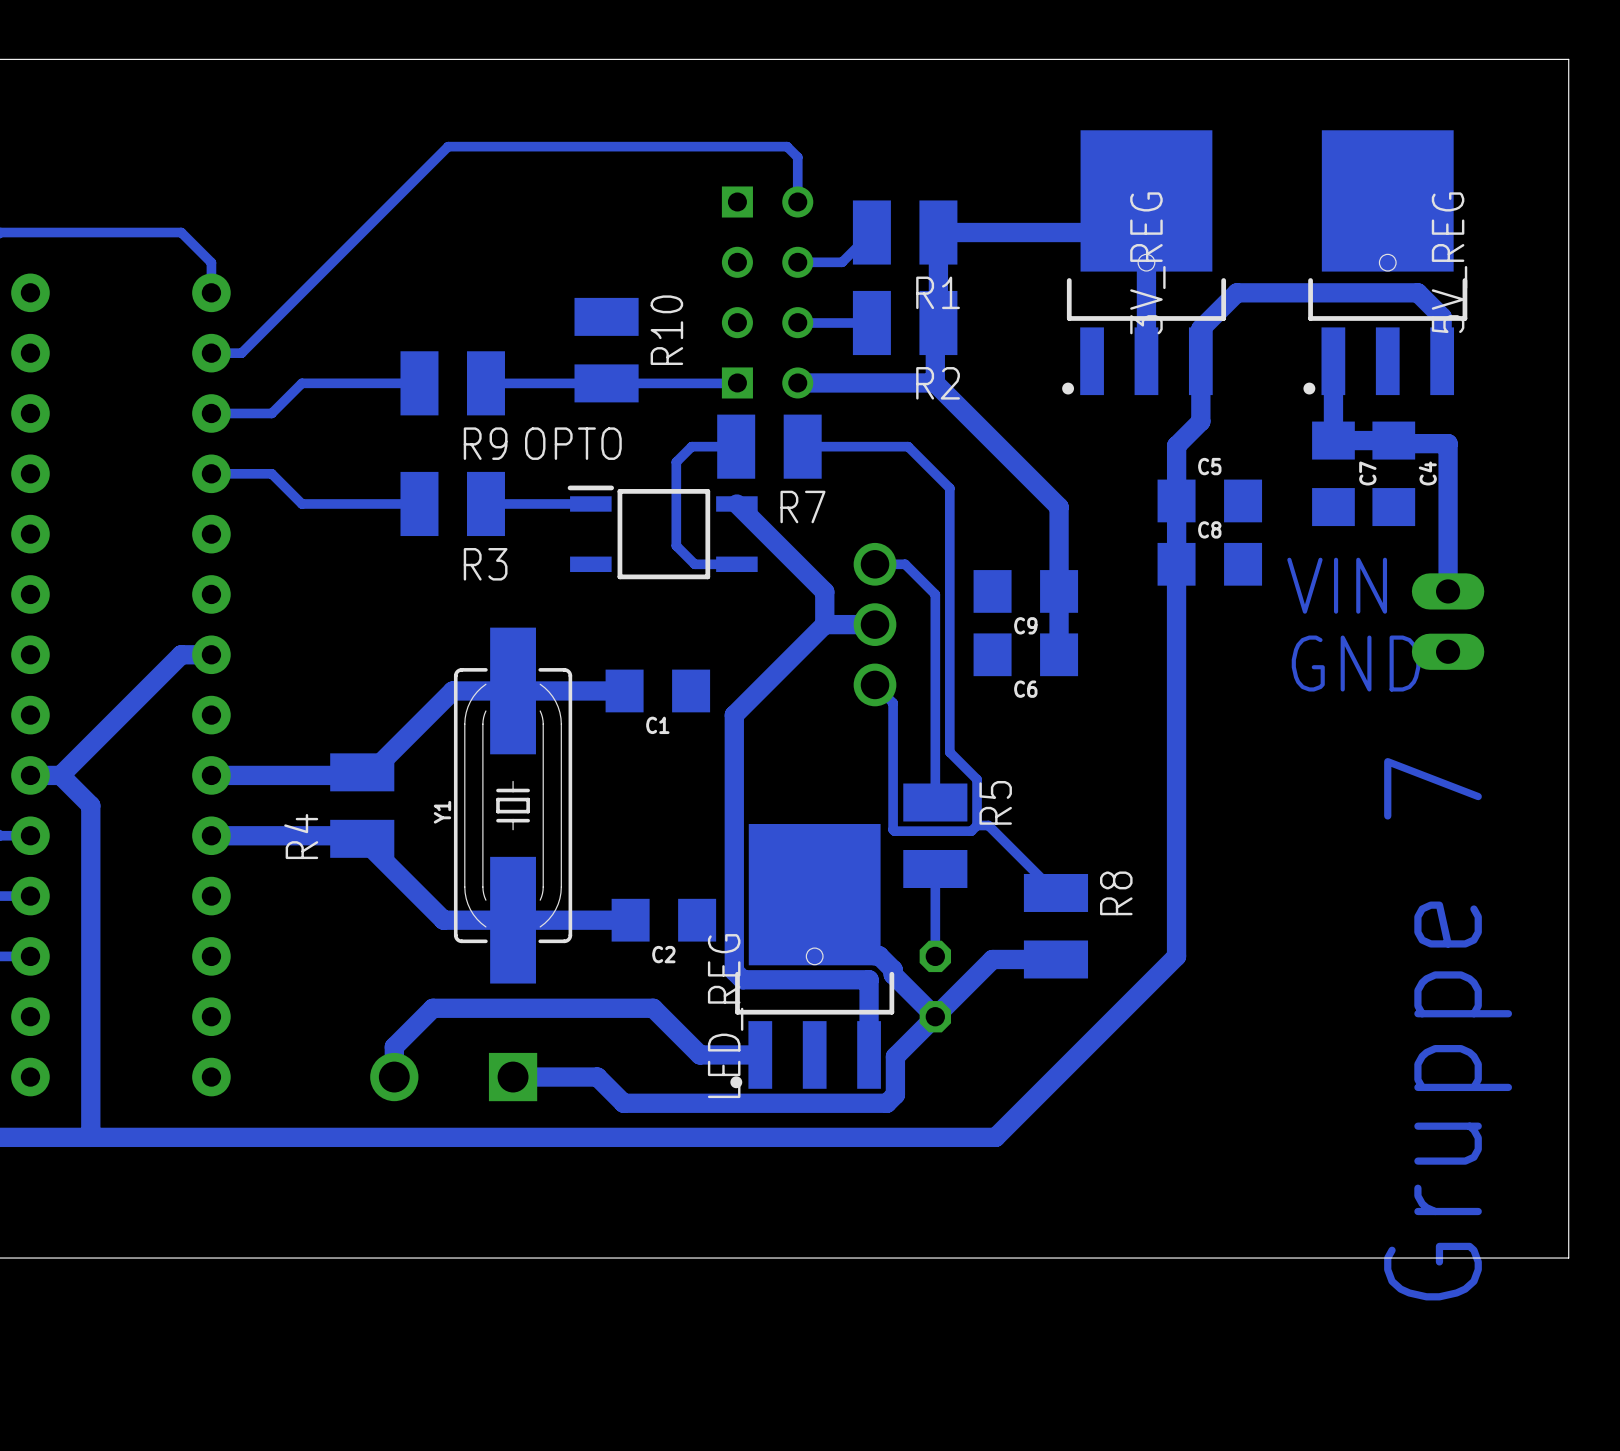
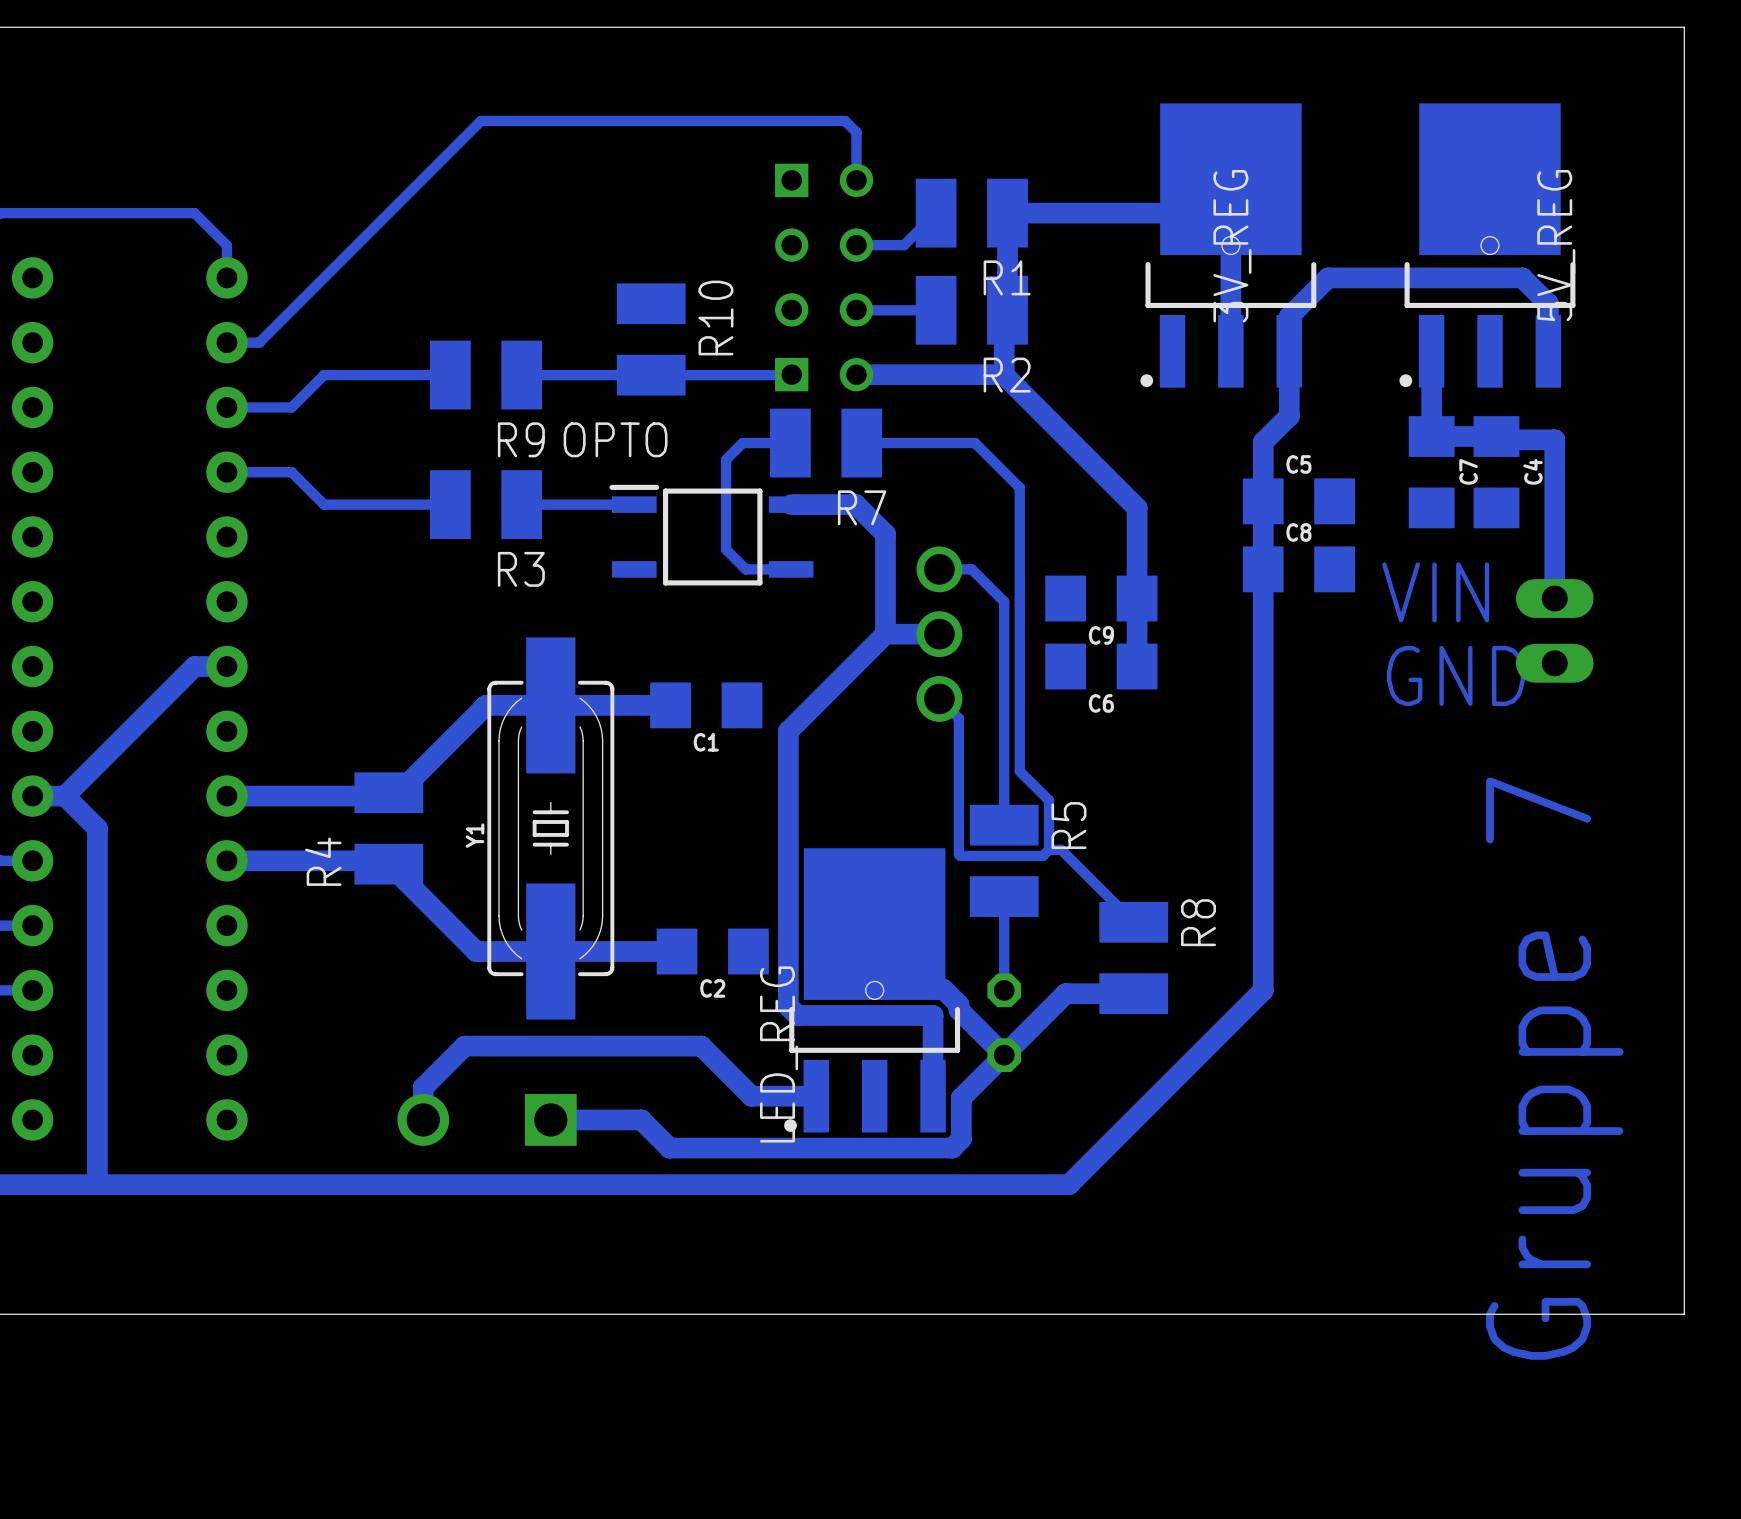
bottom track: (736, 503) (824, 591) -> (791, 504) (855, 504) (885, 534) (885, 598)

